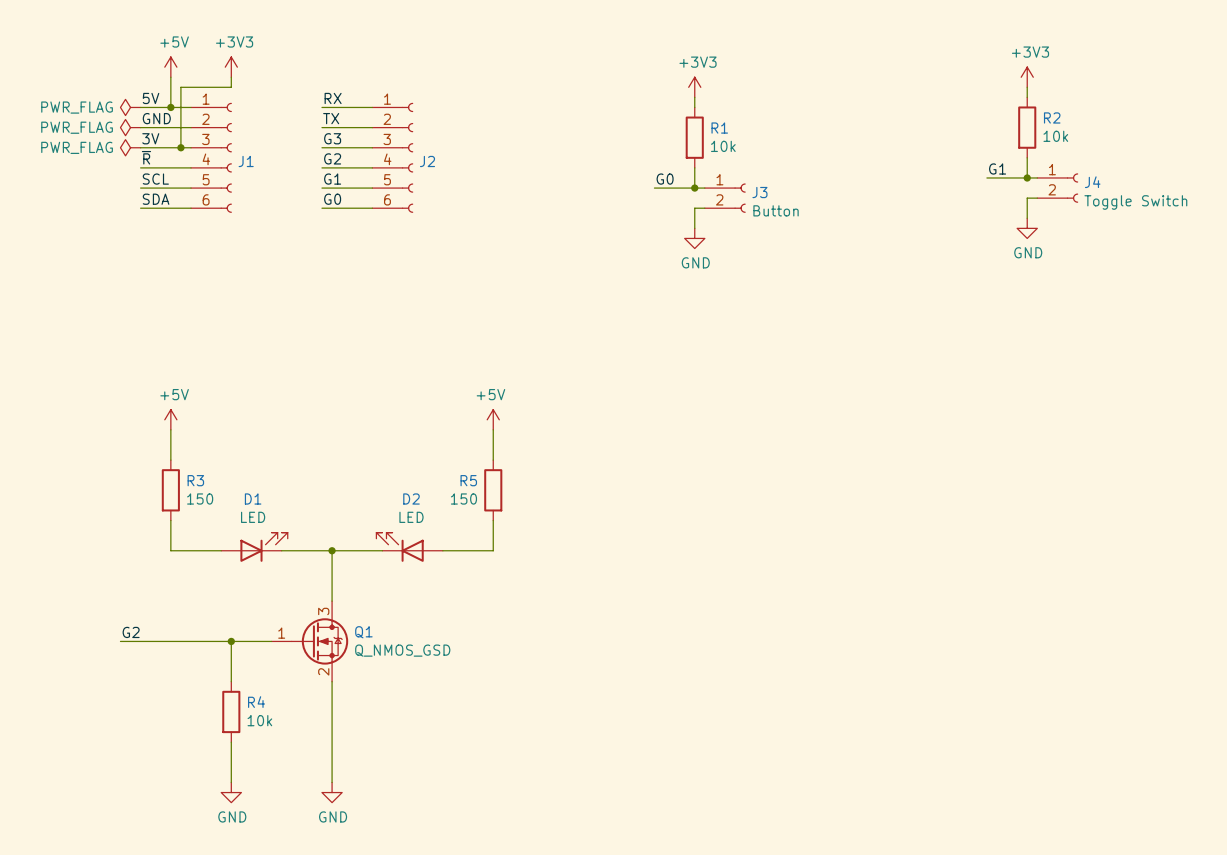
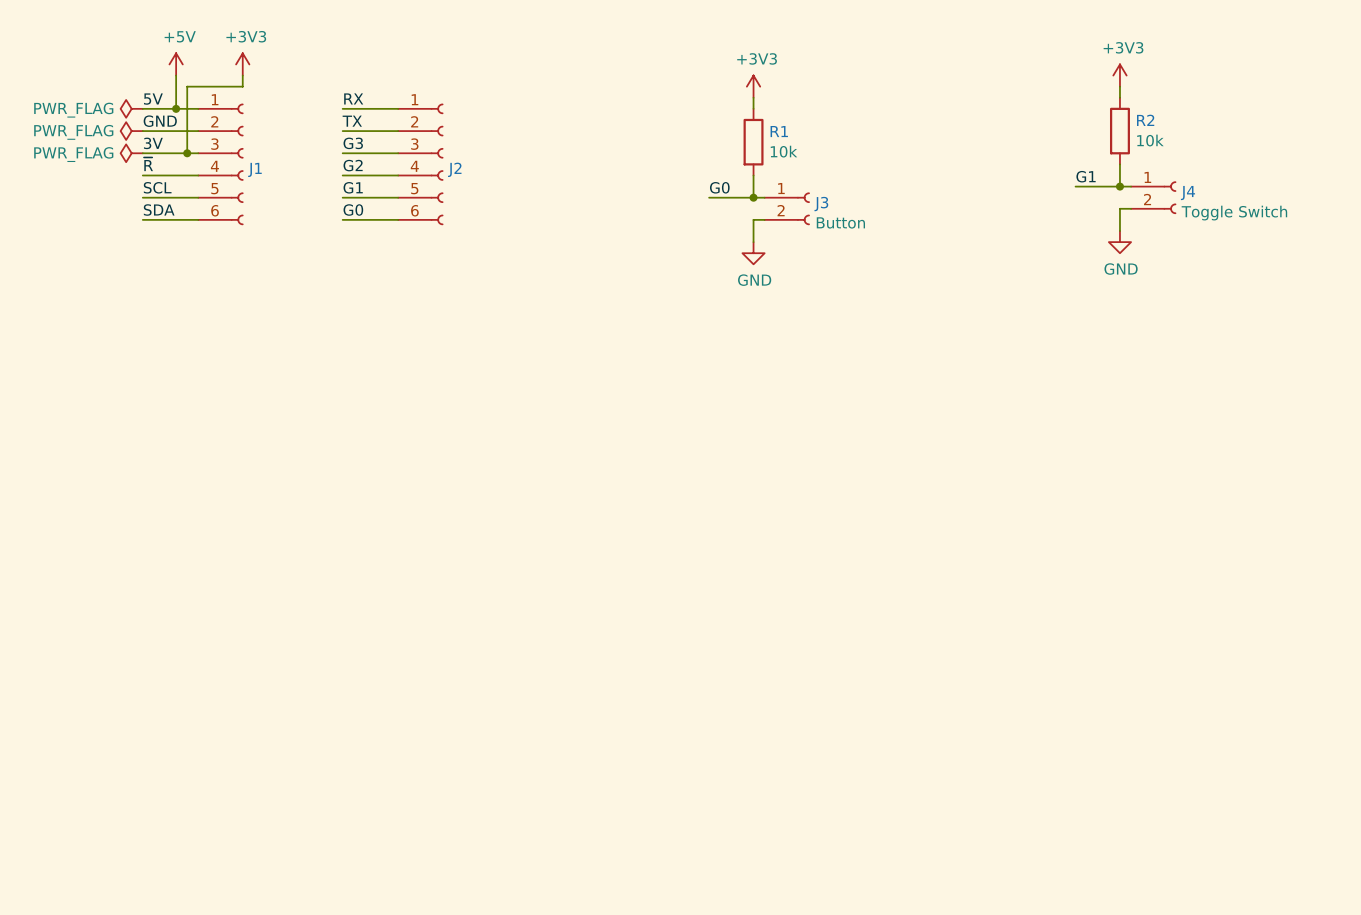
power symbol: +5V (170, 419) -> none
power symbol: +5V (493, 419) -> none
wire: (170, 429) (170, 460) -> none
wire: (493, 429) (493, 460) -> none
R3: 150 (170, 490) -> none
R5: 150 (493, 490) -> none
wire: (170, 520) (170, 550) (221, 550) -> none
wire: (493, 520) (493, 550) (442, 550) -> none
D1: LED (254, 547) -> none
D2: LED (409, 547) -> none
wire: (281, 550) (382, 550) -> none
wire: (332, 550) (332, 601) -> none
junction: (332, 550) -> none
label: G2 (131, 632) -> none
wire: (120, 641) (271, 641) -> none
wire: (231, 641) (231, 681) -> none
junction: (231, 641) -> none
Q1: Q_NMOS_GSD (309, 641) -> none
wire: (332, 681) (332, 782) -> none
R4: 10k (231, 711) -> none
wire: (231, 742) (231, 782) -> none
power symbol: GND (231, 792) -> none
power symbol: GND (332, 792) -> none

